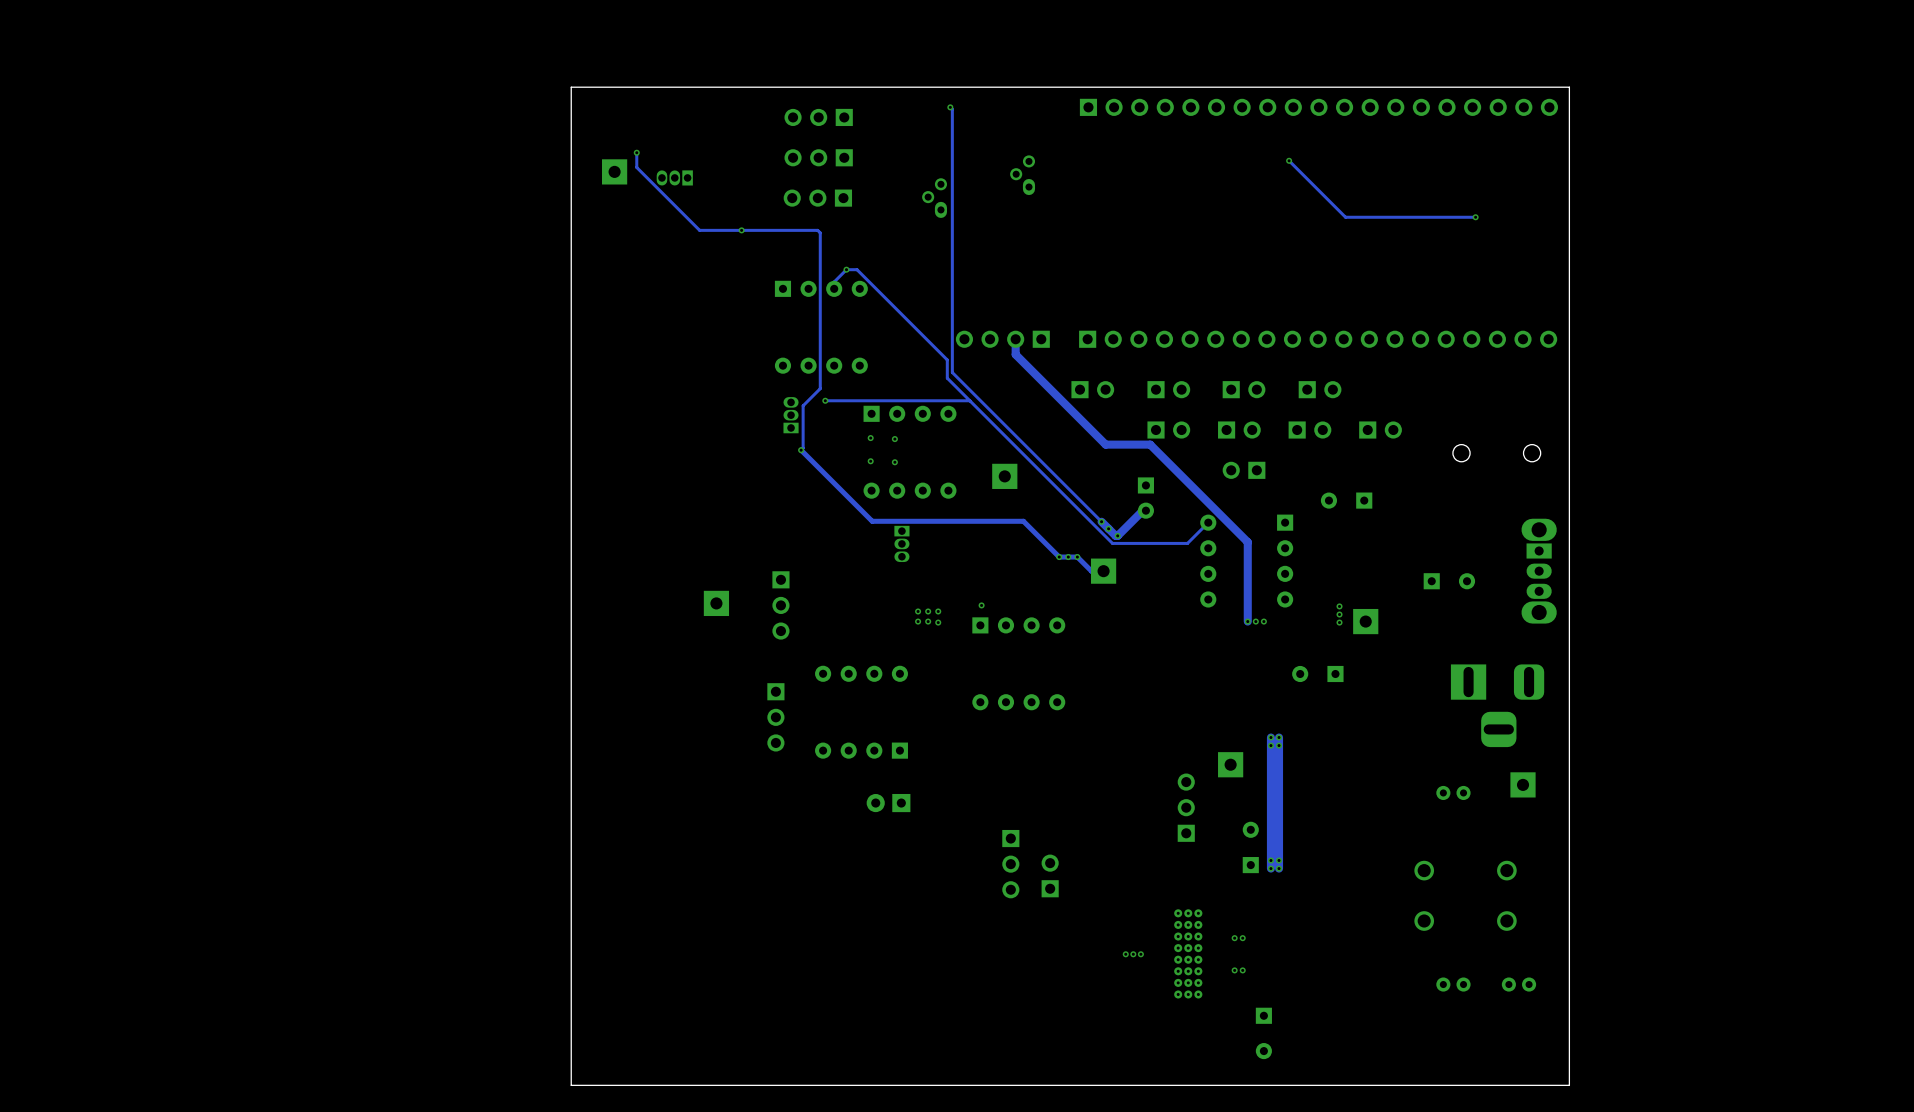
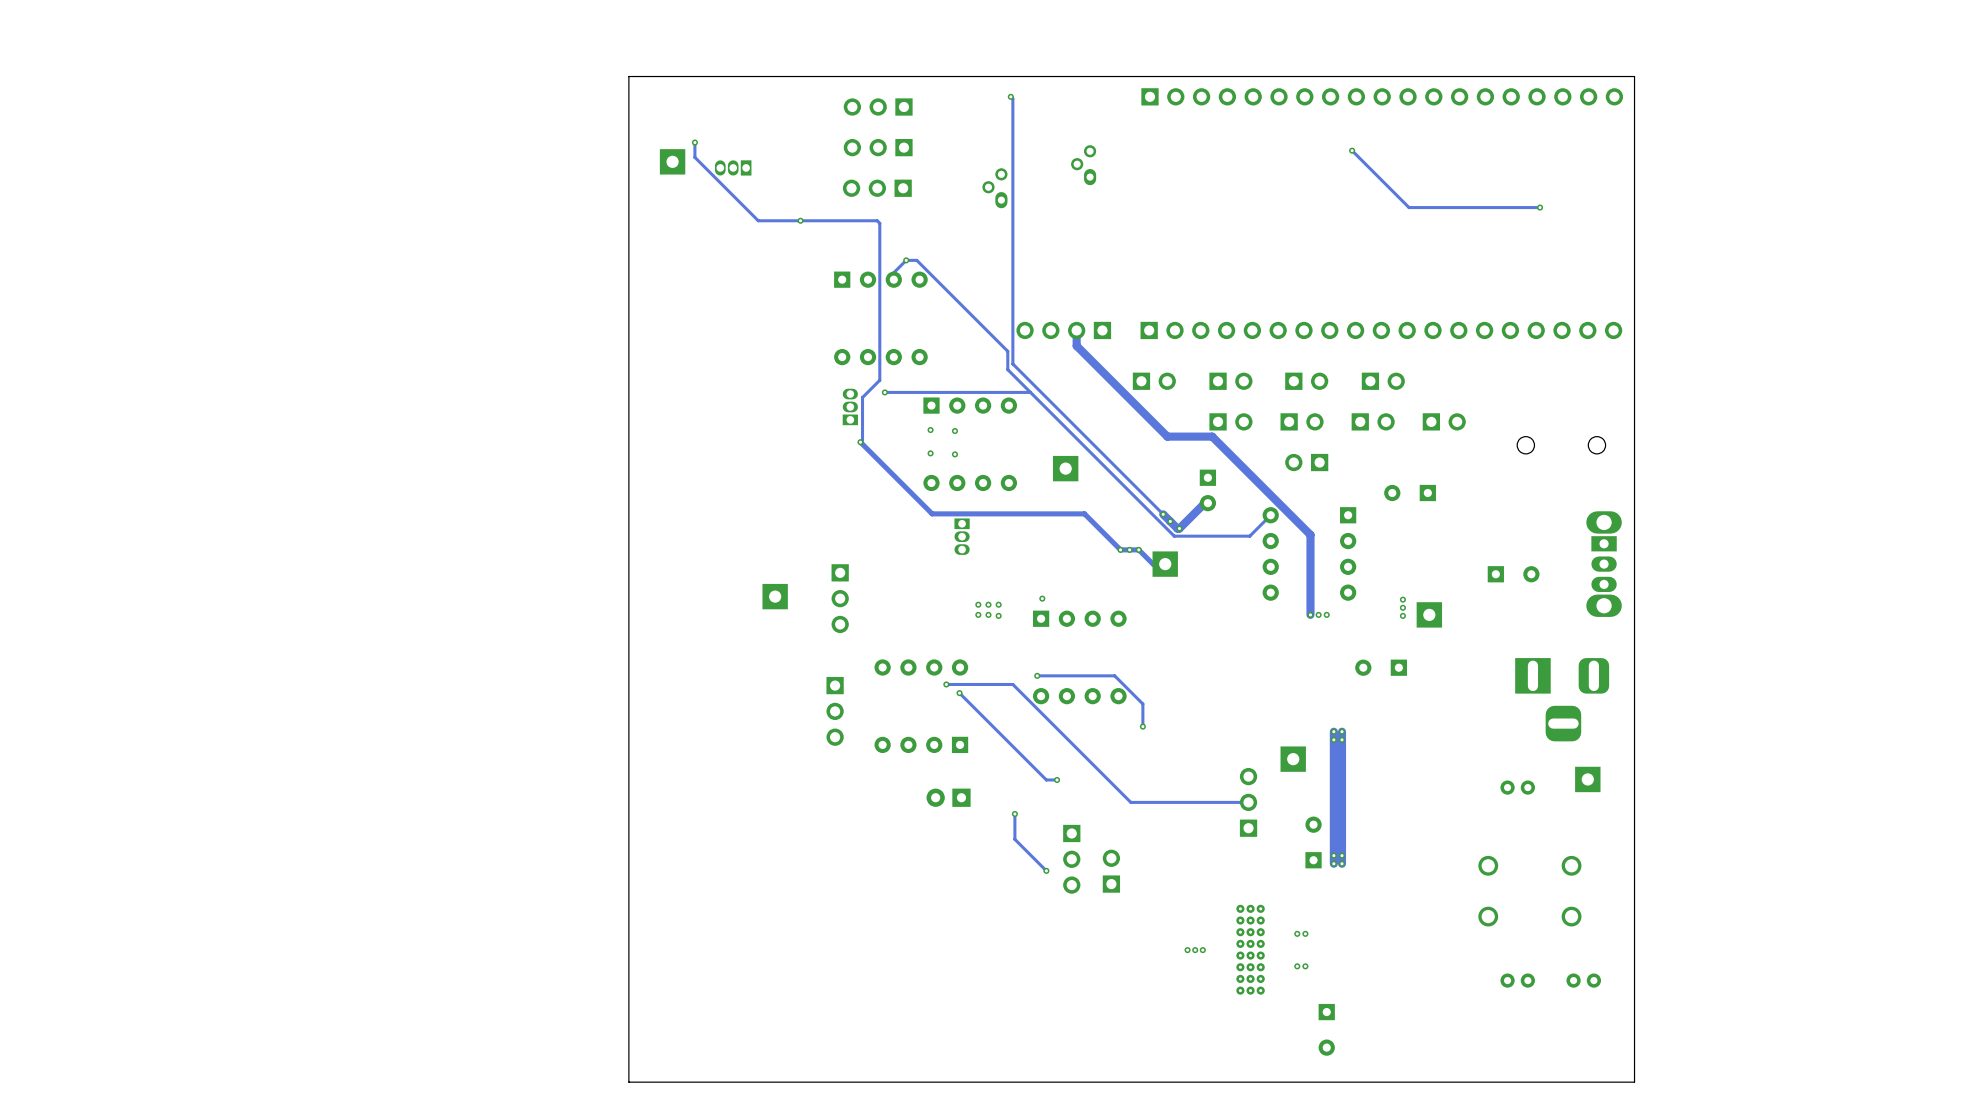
track: none -> (1037, 675) (1114, 675) (1142, 704) (1142, 726)
via: none -> (1037, 675)
track: none -> (946, 684) (1012, 684) (1130, 802) (1248, 802)
via: none -> (946, 684)
track: none -> (959, 693) (1046, 779) (1057, 779)
via: none -> (959, 693)
via: none -> (1142, 726)
via: none -> (1057, 779)
track: none -> (1014, 813) (1014, 839) (1046, 870)
via: none -> (1014, 813)
via: none -> (1046, 870)

